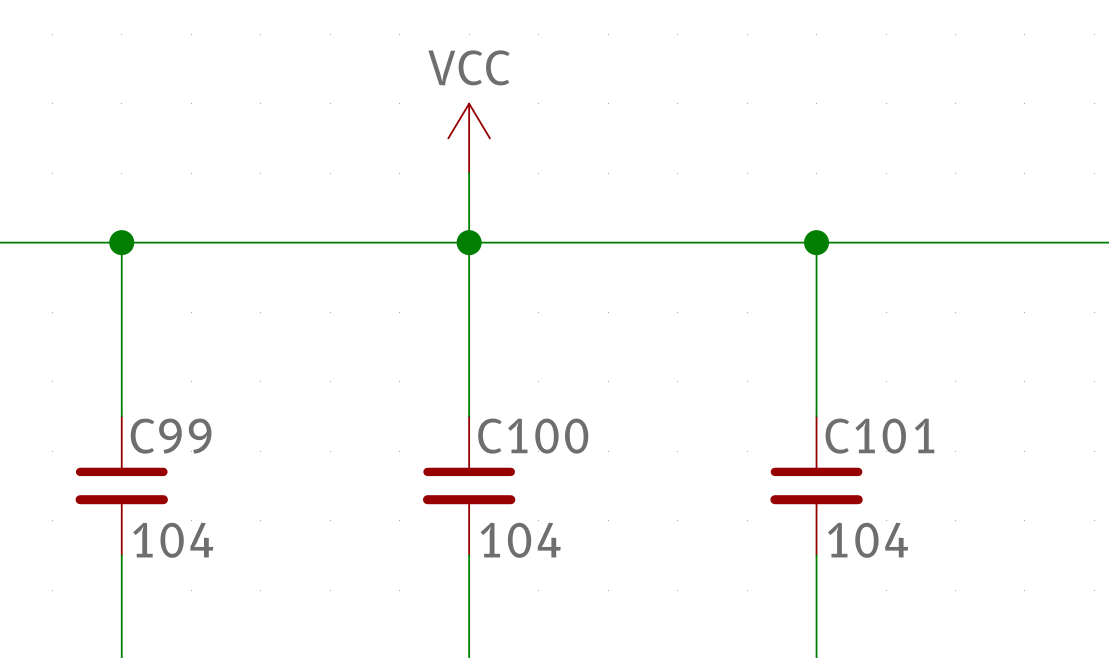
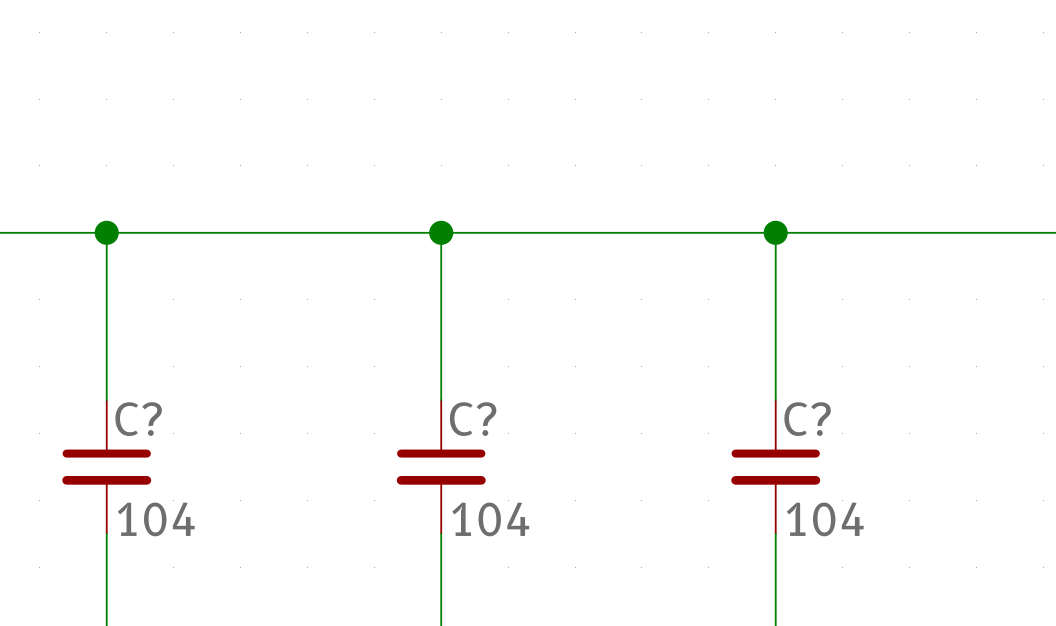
power symbol: VCC (469, 138) -> none
wire: (469, 173) (469, 242) -> none
C99 name: C99 (171, 436) -> C? (138, 419)
C100 name: C100 (533, 436) -> C? (473, 419)
C101 name: C101 (879, 436) -> C? (807, 419)

